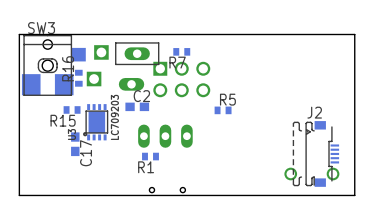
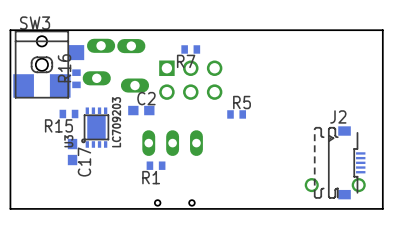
part footprint: [94, 45, 109, 60] -> [86, 38, 116, 53]
part side: bottom (137, 53) -> top (131, 46)
part footprint: [86, 71, 102, 87] -> [82, 71, 111, 86]

